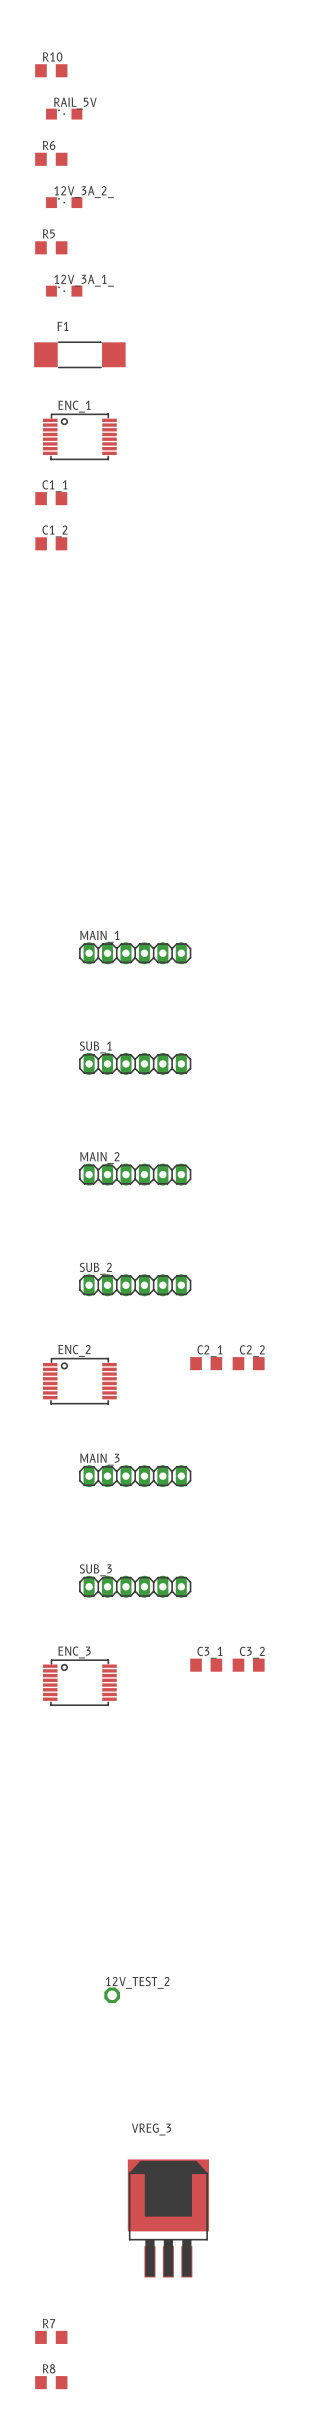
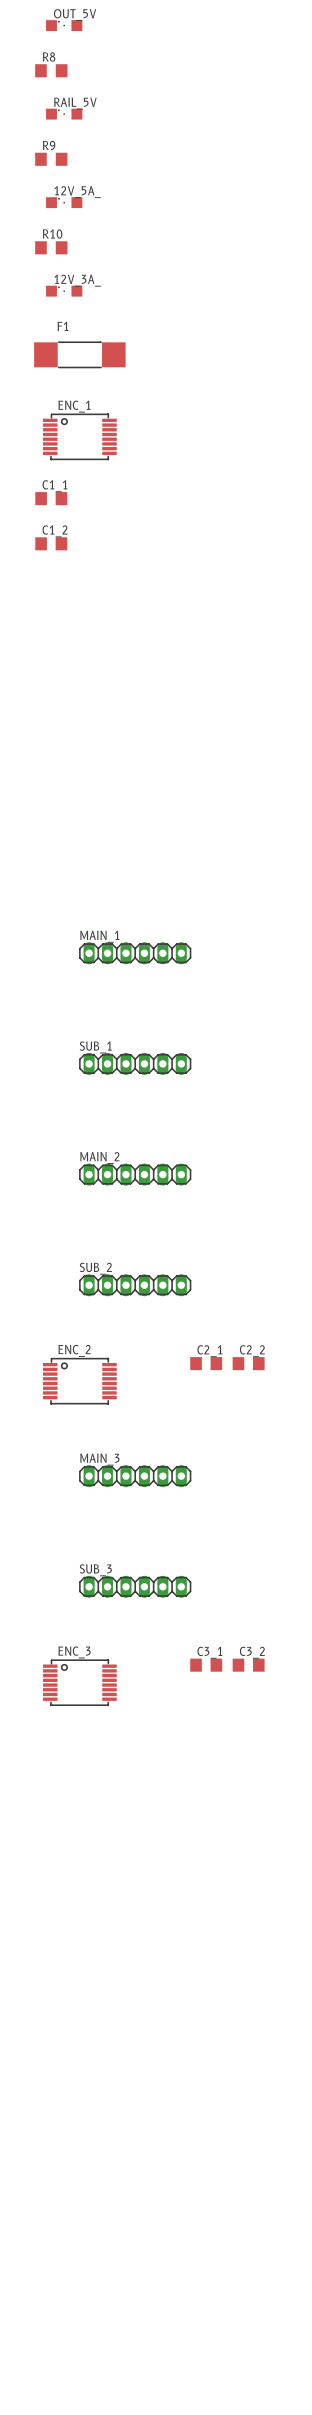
OUT_5V: none -> (64, 25)
R10 name: R10 (52, 56) -> R8 (49, 56)
R6 name: R6 (49, 145) -> R9 (49, 145)
12V_3A_2_ name: 12V_3A_2_ (84, 192) -> 12V_5A_ (77, 192)
R5 name: R5 (48, 234) -> R10 (52, 234)
12V_3A_1_ name: 12V_3A_1_ (84, 280) -> 12V_3A_ (77, 280)
12V_TEST_2: (112, 1995) -> none
VREG_3: (168, 2218) -> none
R7: (51, 2337) -> none
R8: (51, 2382) -> none

